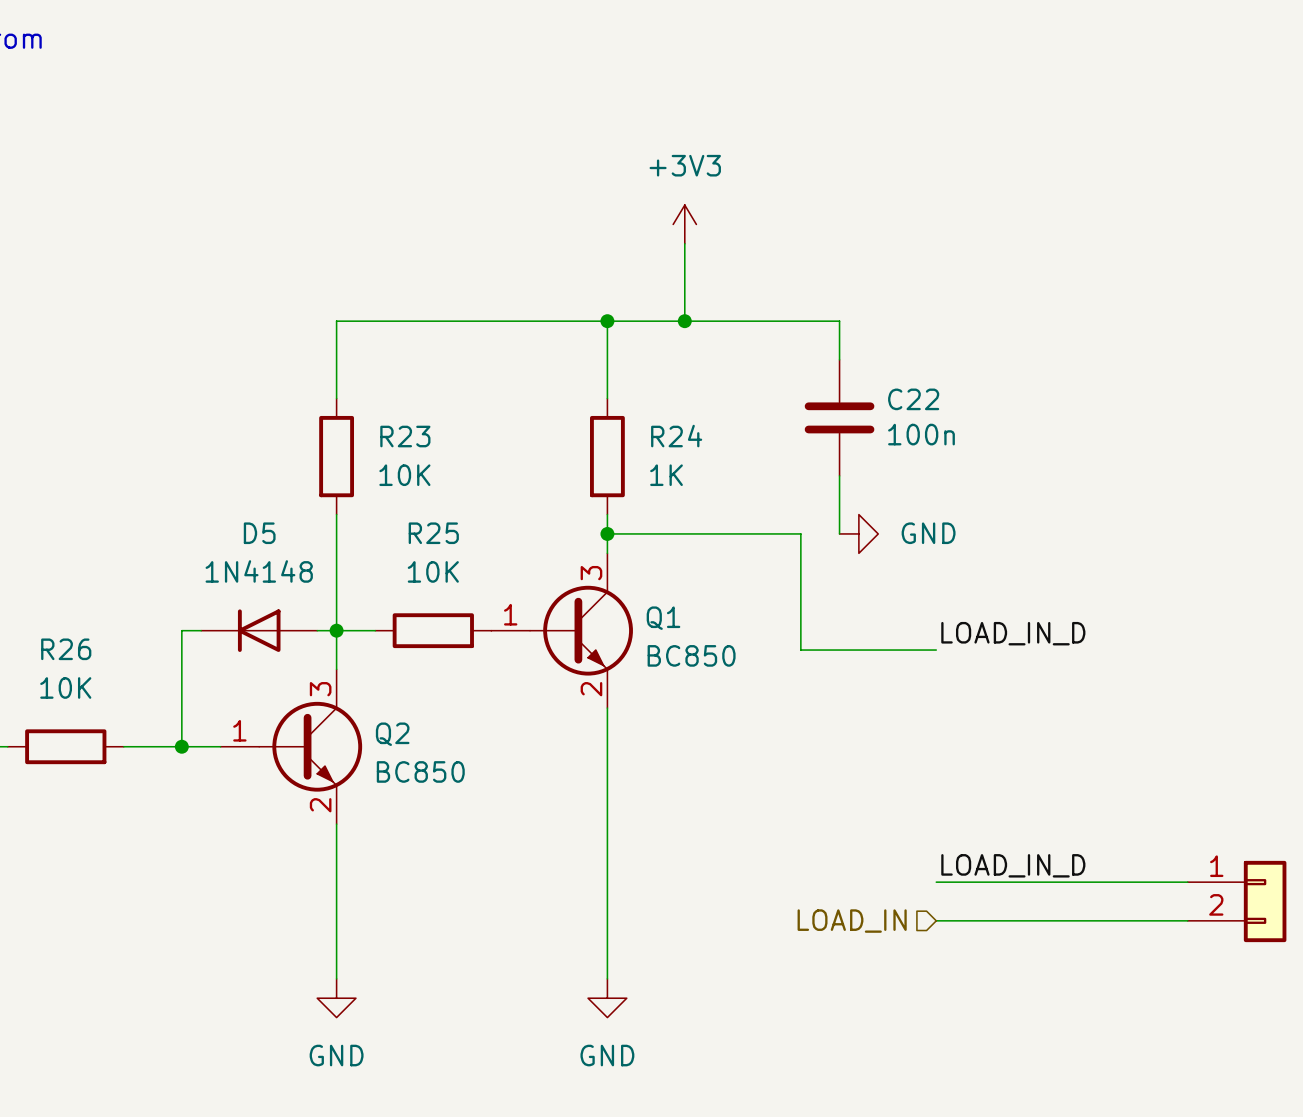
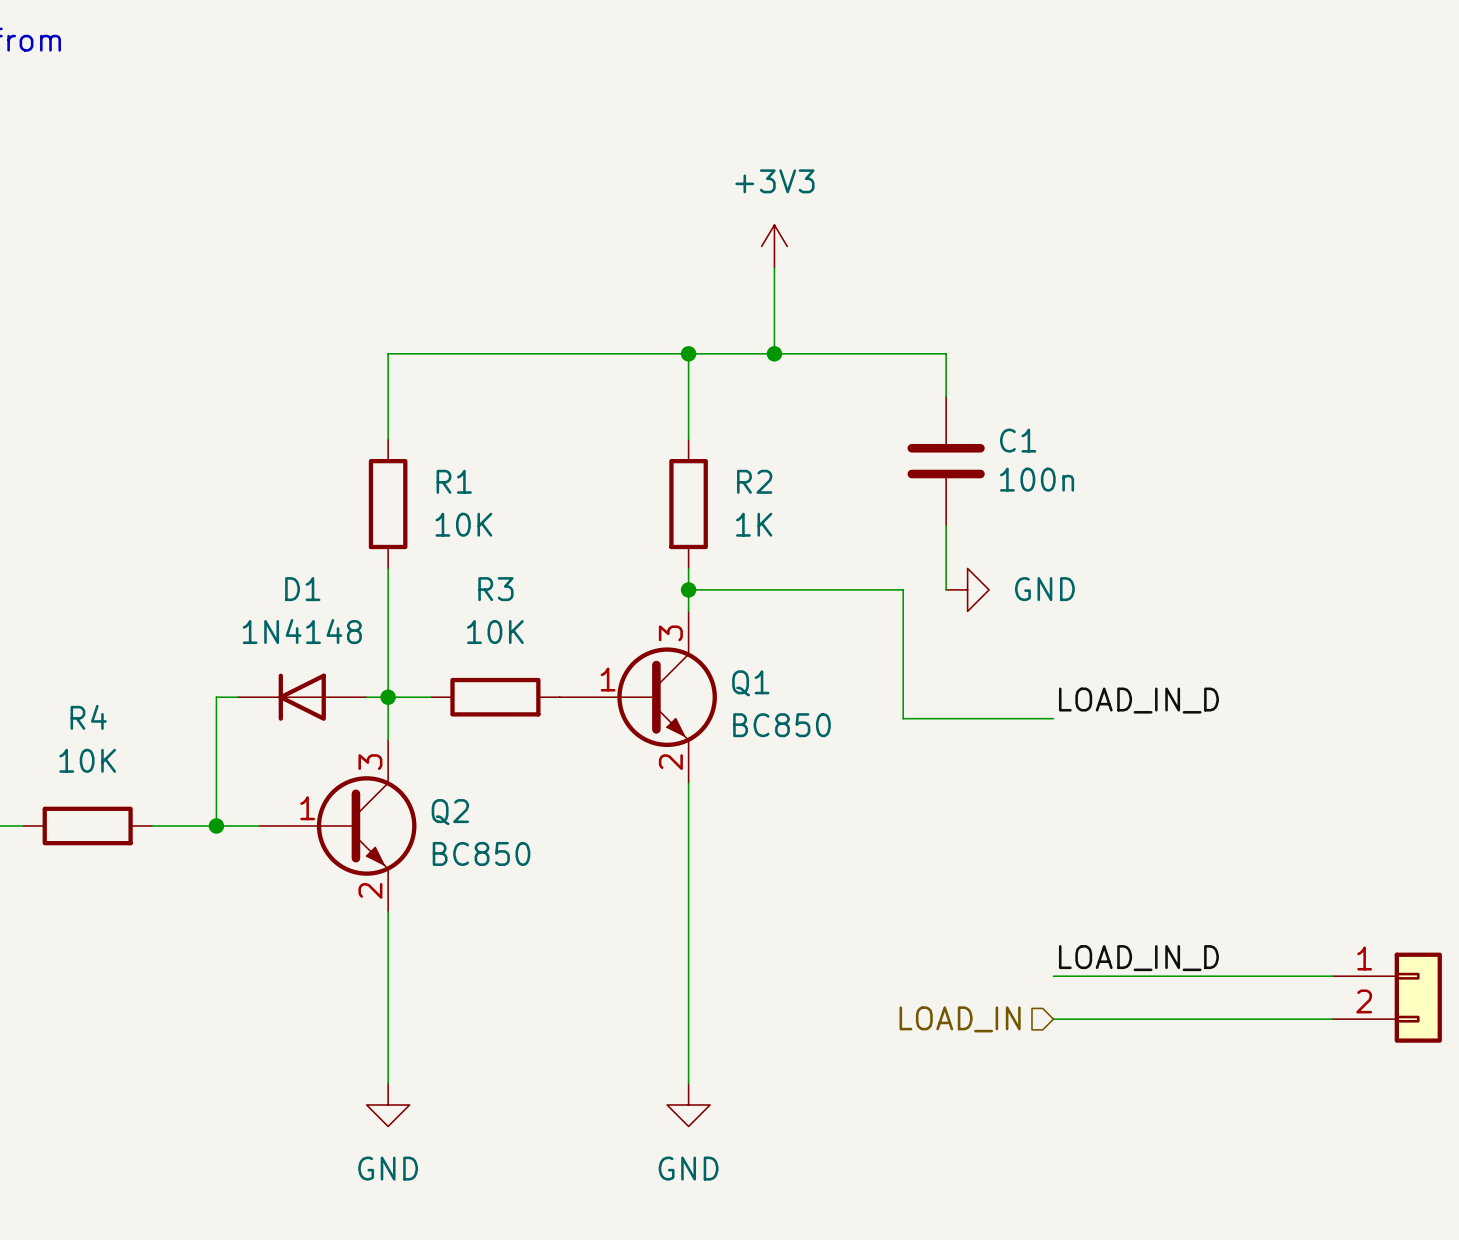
C22 name: C22 (913, 399) -> C1 (1018, 440)
R23 name: R23 (405, 436) -> R1 (454, 481)
R24 name: R24 (676, 436) -> R2 (754, 481)
D5 name: D5 (259, 533) -> D1 (302, 589)
R25 name: R25 (433, 533) -> R3 (495, 589)
Q1 symbol: [491, 553, 633, 709] -> [559, 611, 717, 784]
R26 name: R26 (66, 649) -> R4 (88, 717)
Q2 symbol: [220, 669, 363, 825] -> [259, 740, 417, 912]

